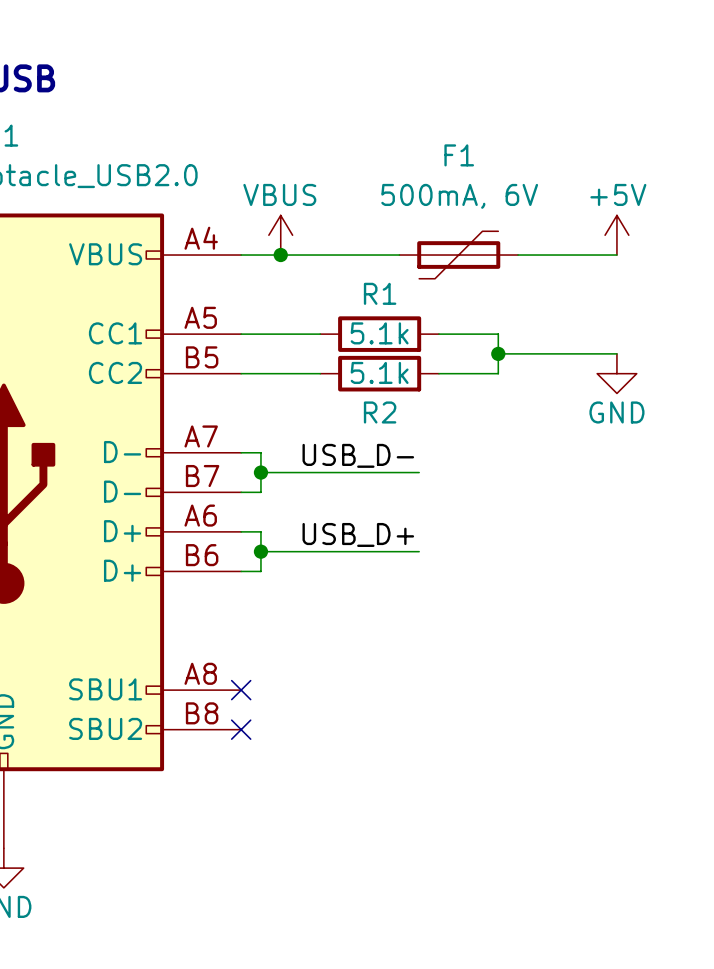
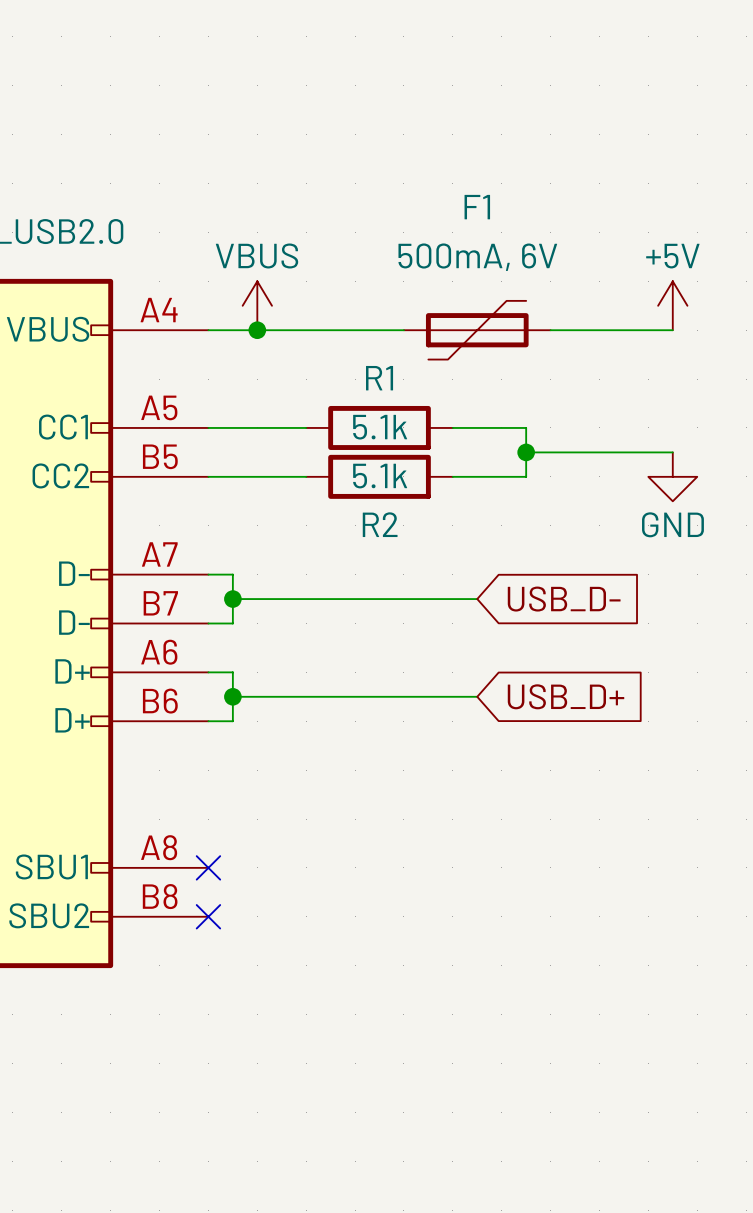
label: USB_D- (358, 455) -> none
wire: none -> (428, 599) (477, 599)
global label: none -> USB_D- (564, 599)
label: USB_D+ (358, 534) -> none
wire: none -> (428, 696) (477, 696)
global label: none -> USB_D+ (566, 696)

